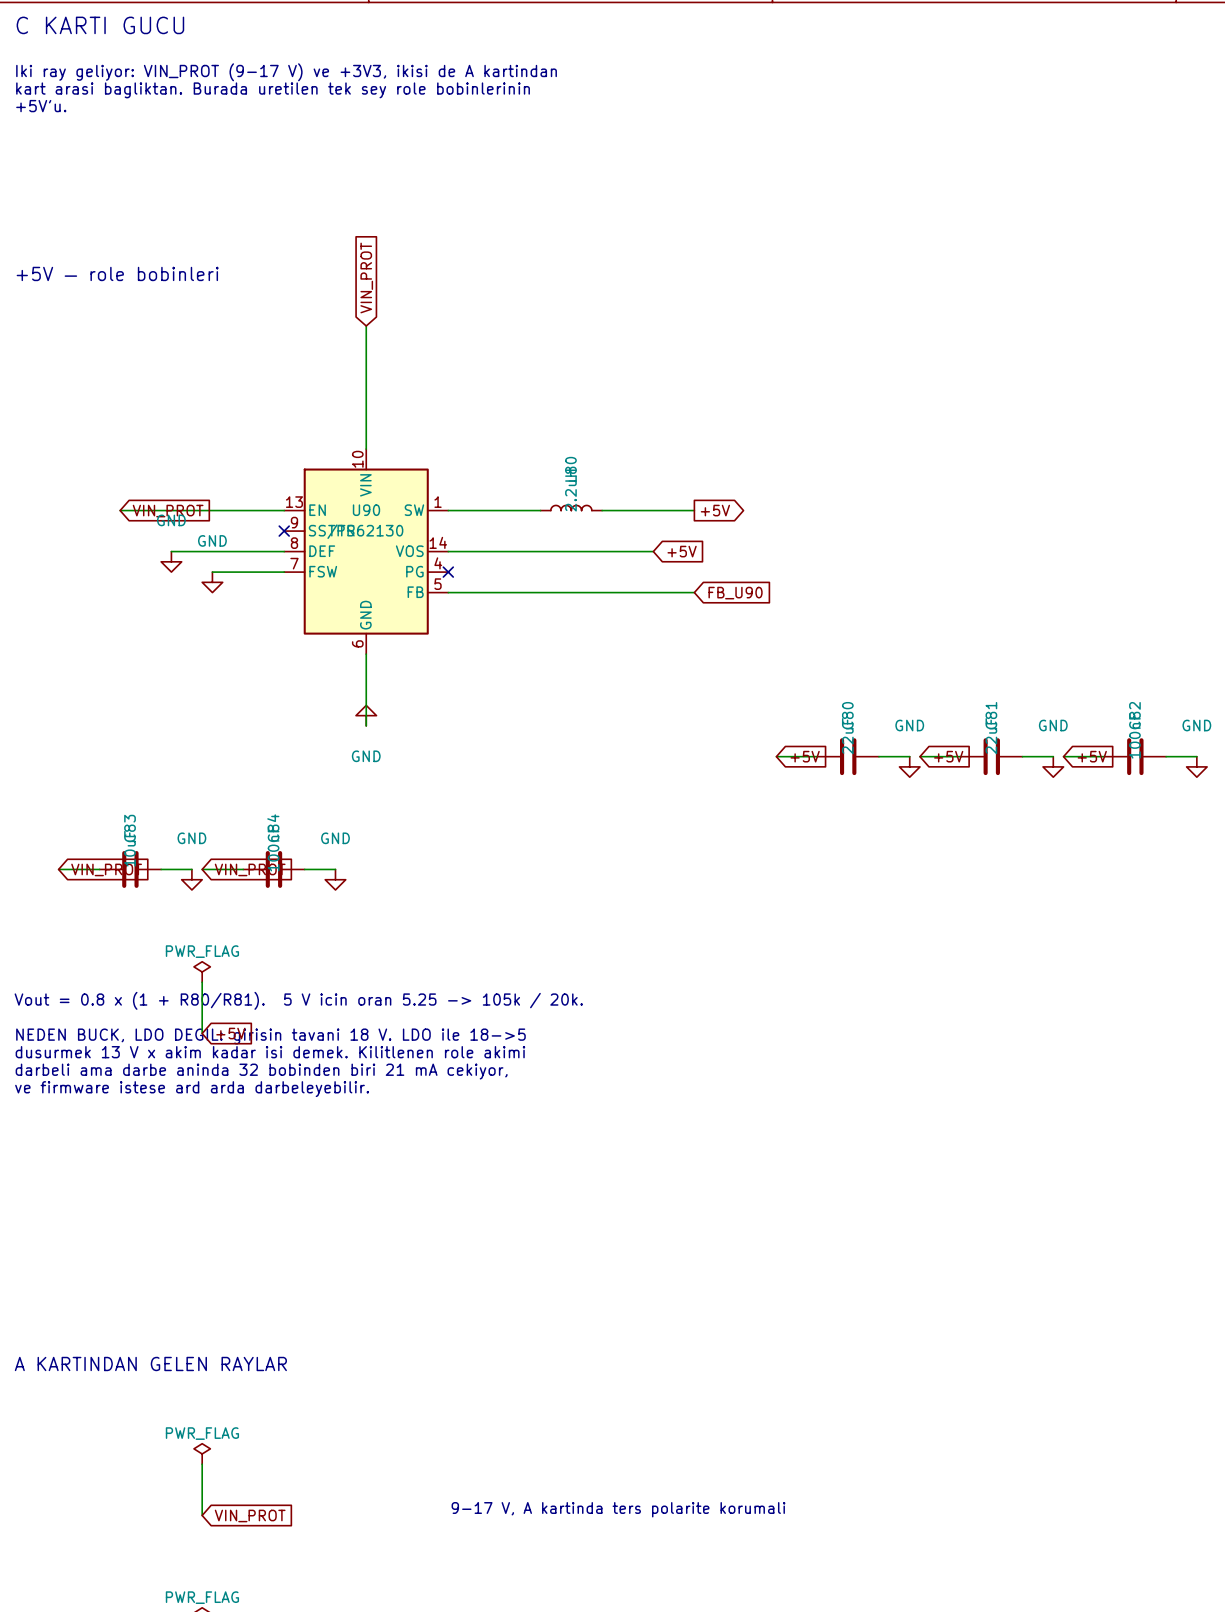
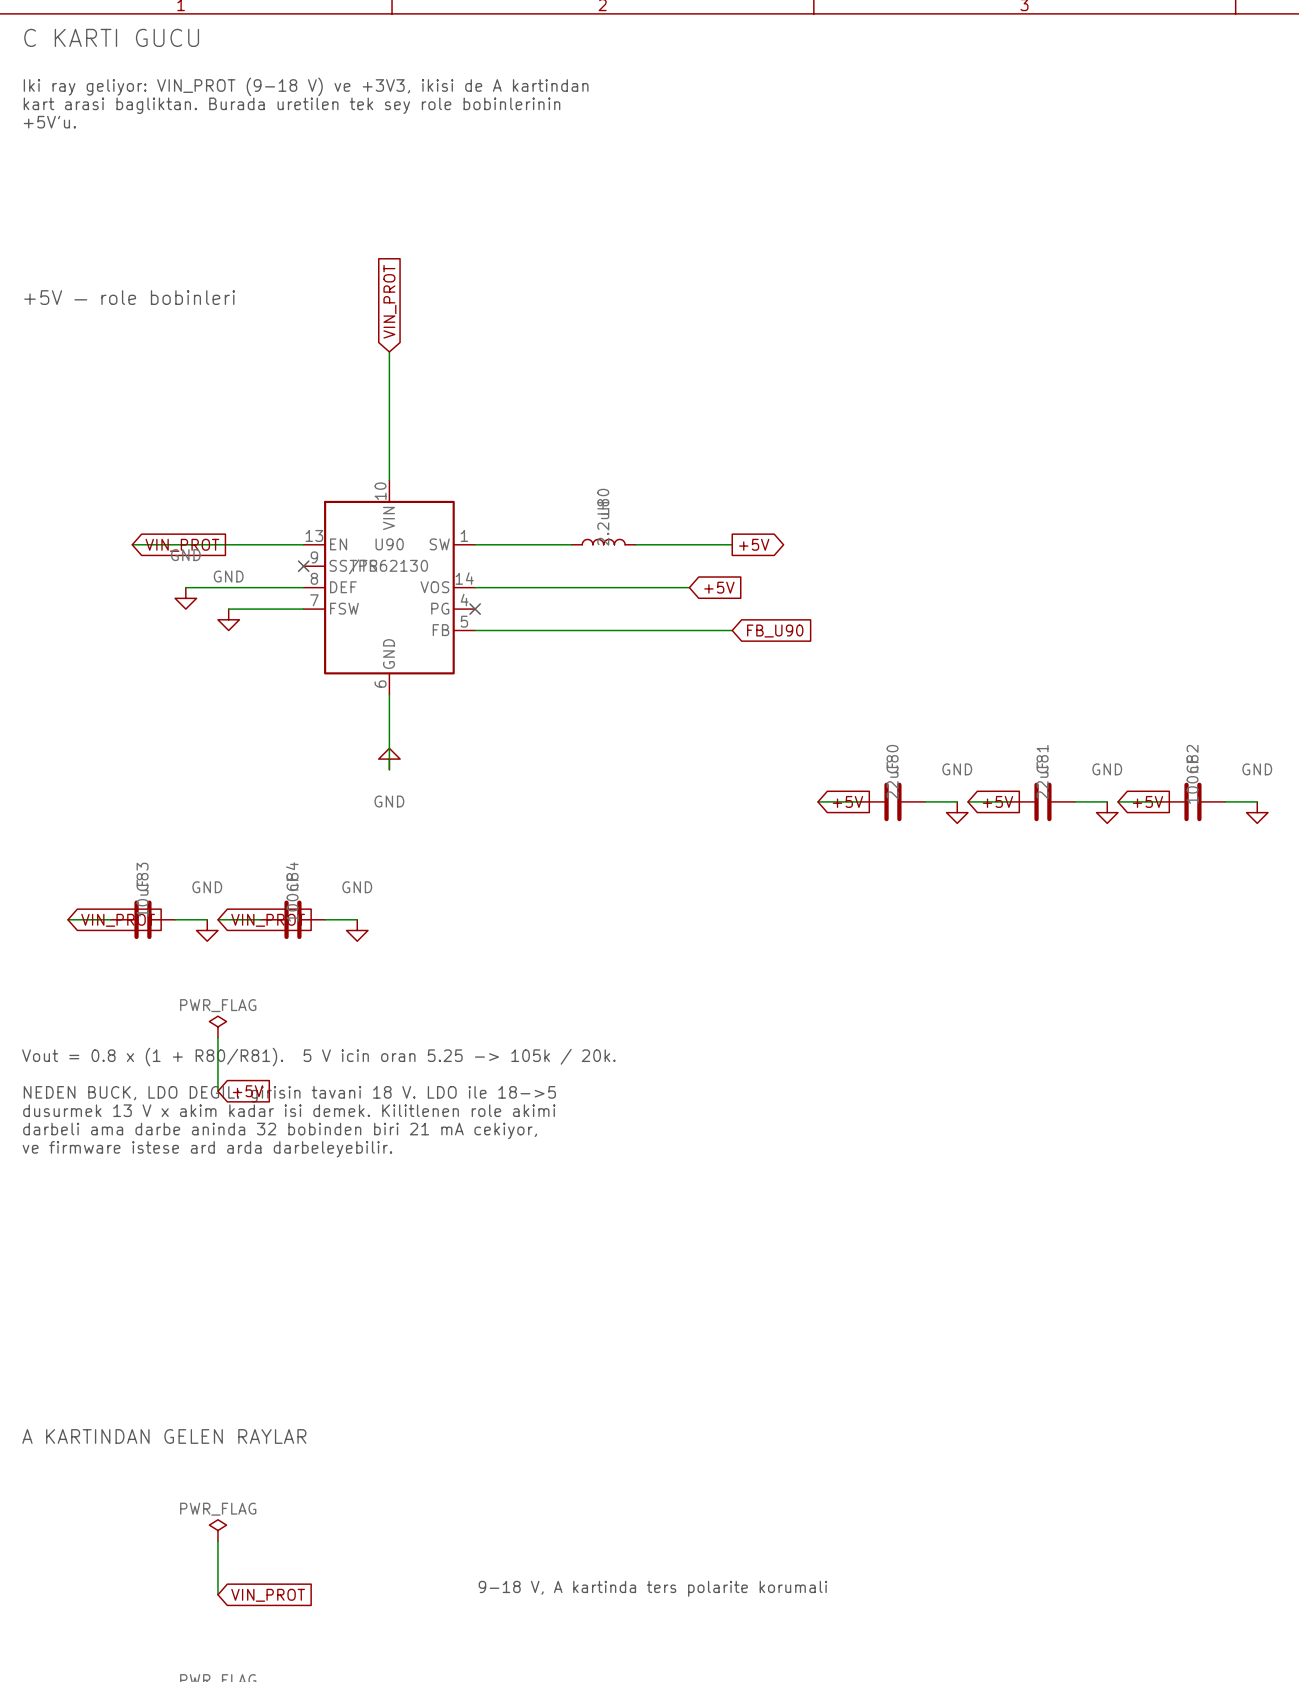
text: Iki ray geliyor: VIN_PROT (9-17 V) ve +3V3, ikisi de A kartindan (286, 72) -> Iki ray geliyor: VIN_PROT (9-18 V) ve +3V3, ikisi de A kartindan (306, 86)
text: 9-17 V, A kartinda ters polarite korumali (618, 1509) -> 9-18 V, A kartinda ters polarite korumali (652, 1588)

